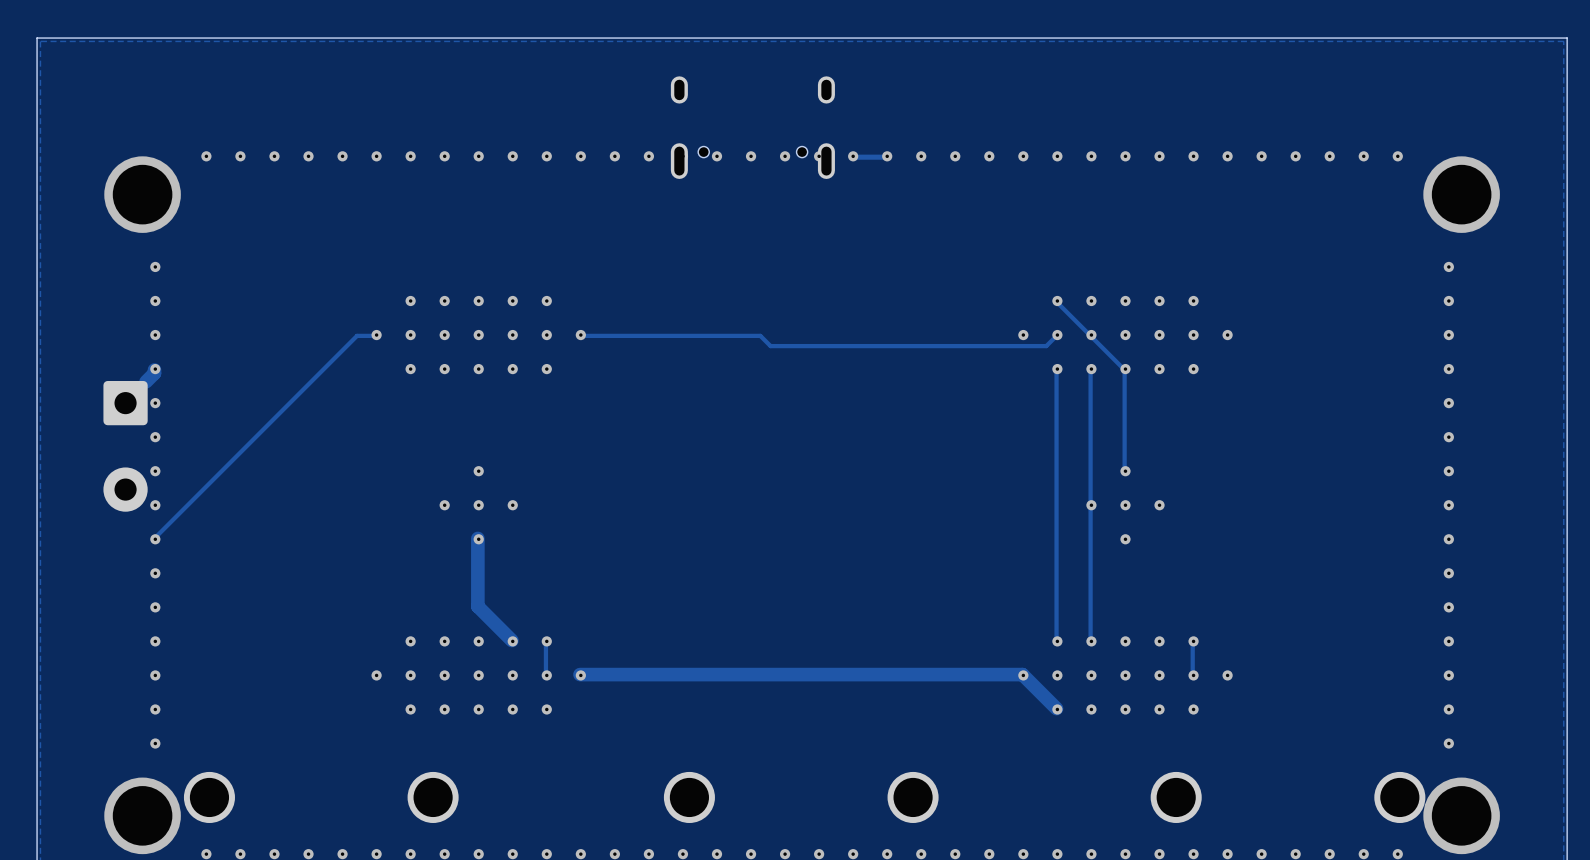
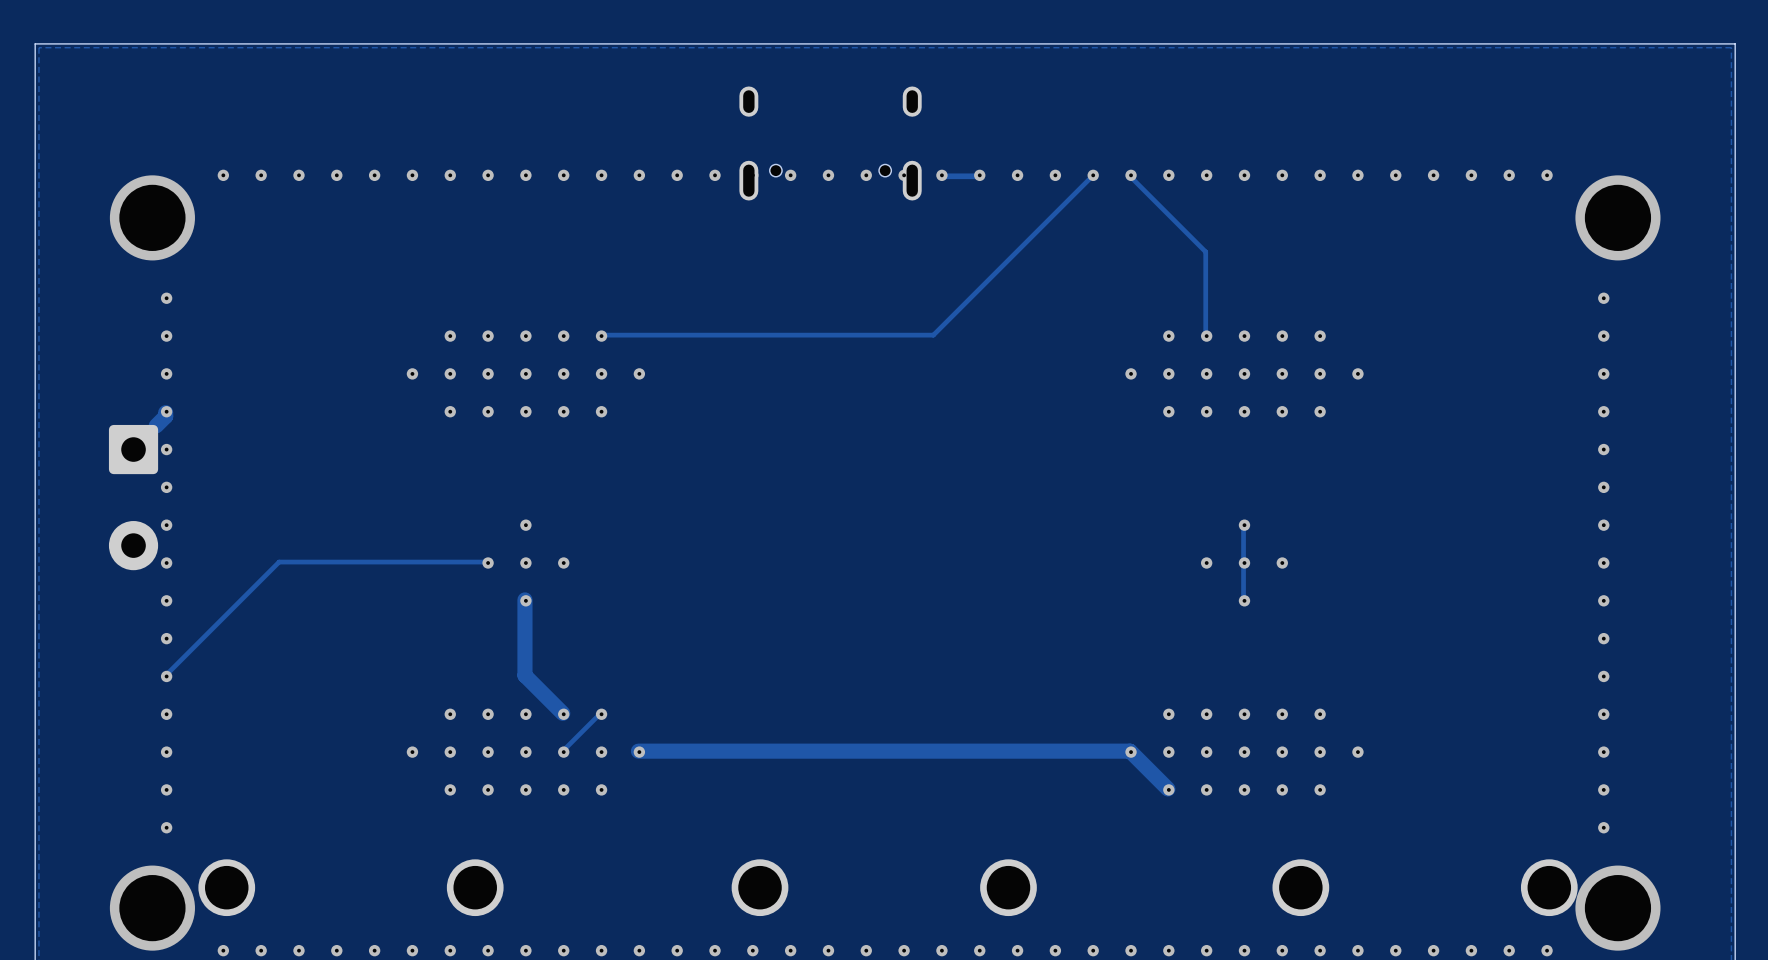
track: none -> (1092, 176) (933, 335) (602, 335) (600, 337)
track: none -> (1130, 176) (1205, 251) (1205, 337)
track: (1056, 301) (1124, 369) -> none
track: (375, 335) (357, 335) (154, 538) -> none
track: (1056, 335) (1046, 346) (770, 346) (760, 335) (579, 335) -> none
track: (1056, 369) (1056, 640) -> none
track: (1090, 369) (1090, 640) -> none
track: (1124, 369) (1124, 472) -> (1243, 599) (1243, 526)
track: none -> (487, 562) (279, 562) (165, 675)
track: (545, 640) (545, 674) -> (600, 713) (562, 751)
track: (1192, 640) (1192, 674) -> none

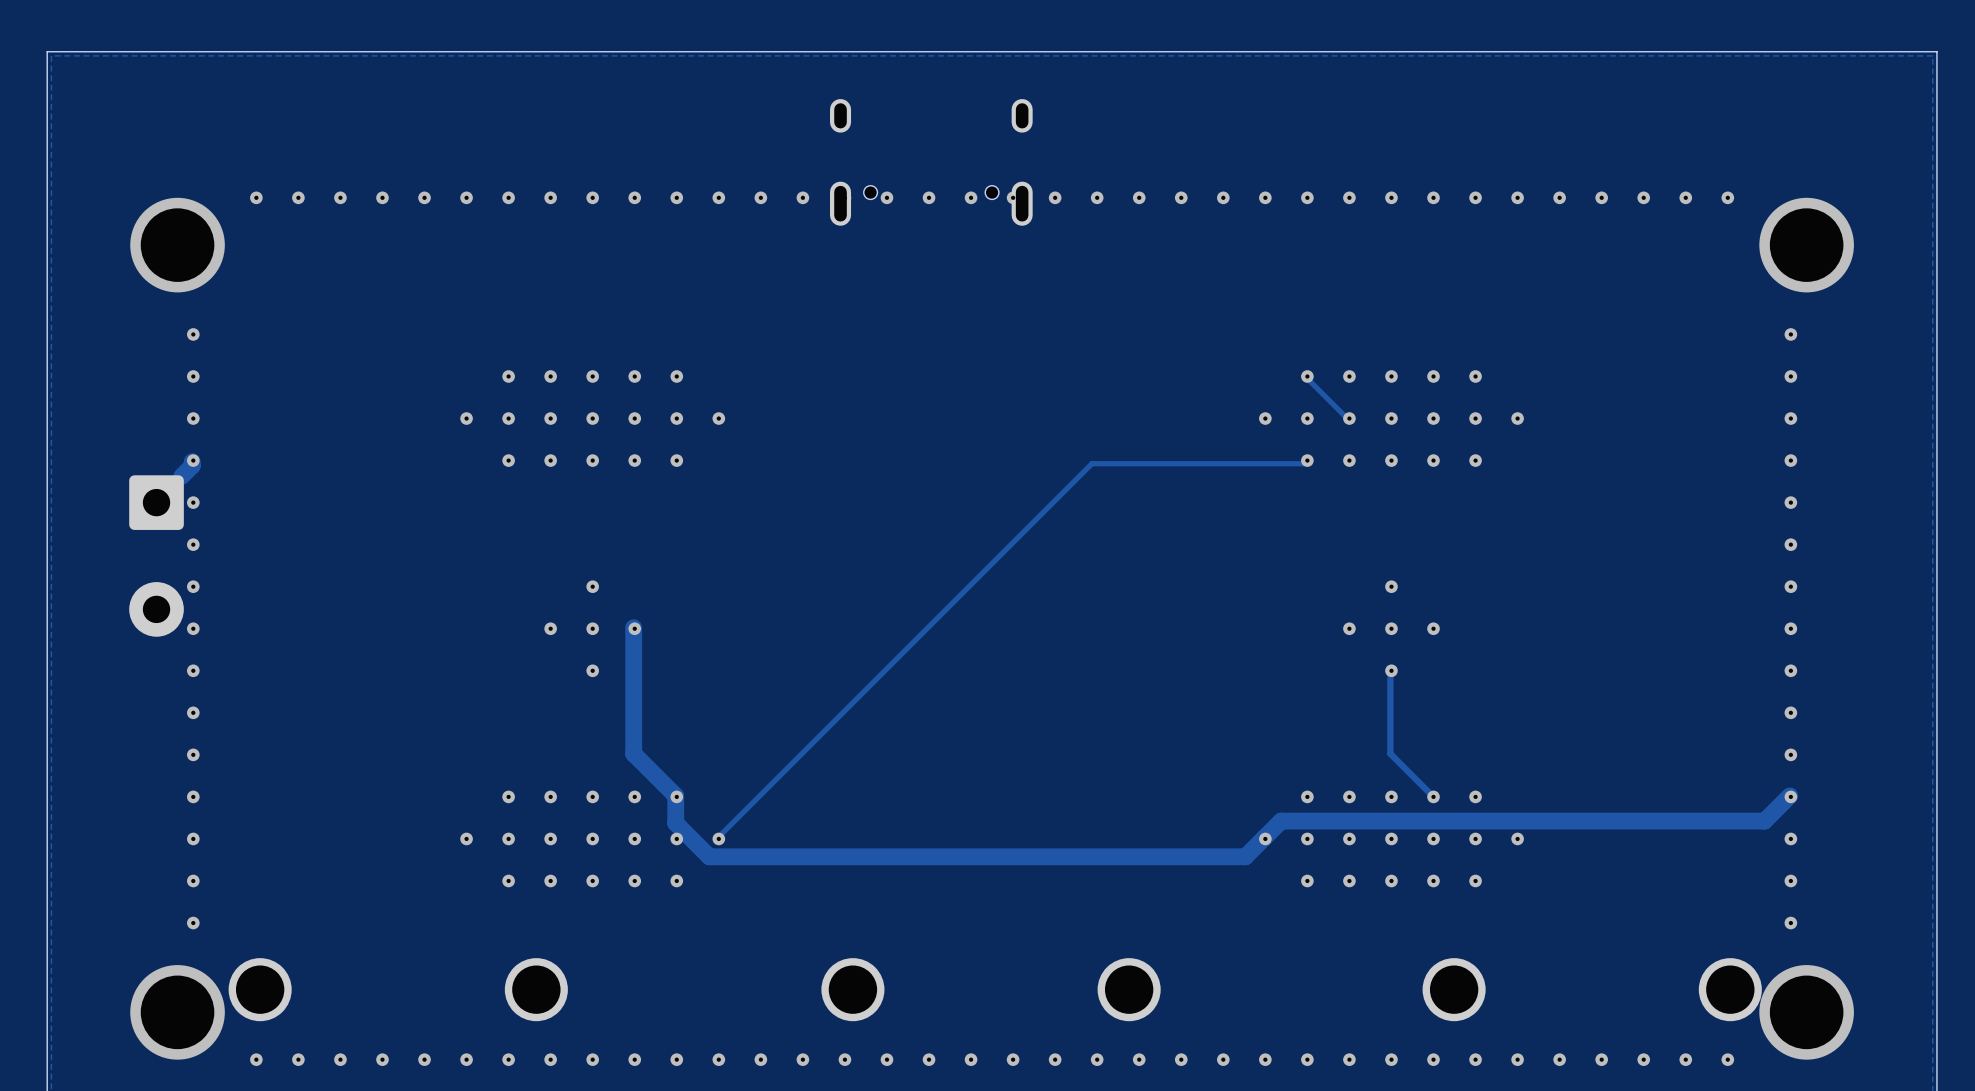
track: (978, 176) (940, 176) -> none
track: (1092, 176) (933, 335) (602, 335) (600, 337) -> none
track: (1130, 176) (1205, 251) (1205, 337) -> none
track: none -> (1306, 377) (1348, 419)
track: (1243, 526) (1243, 599) -> (1432, 795) (1390, 753) (1390, 669)
track: (487, 562) (279, 562) (165, 675) -> none
track: none -> (633, 627) (633, 753) (675, 795) (675, 823) (709, 856) (1245, 856) (1281, 821) (1764, 821) (1789, 795)
track: (524, 599) (524, 675) (562, 713) -> none
track: (600, 713) (562, 751) -> none
track: (1130, 751) (638, 751) -> (1306, 461) (1304, 463) (1091, 463) (717, 837)
track: (1131, 753) (1167, 788) -> none

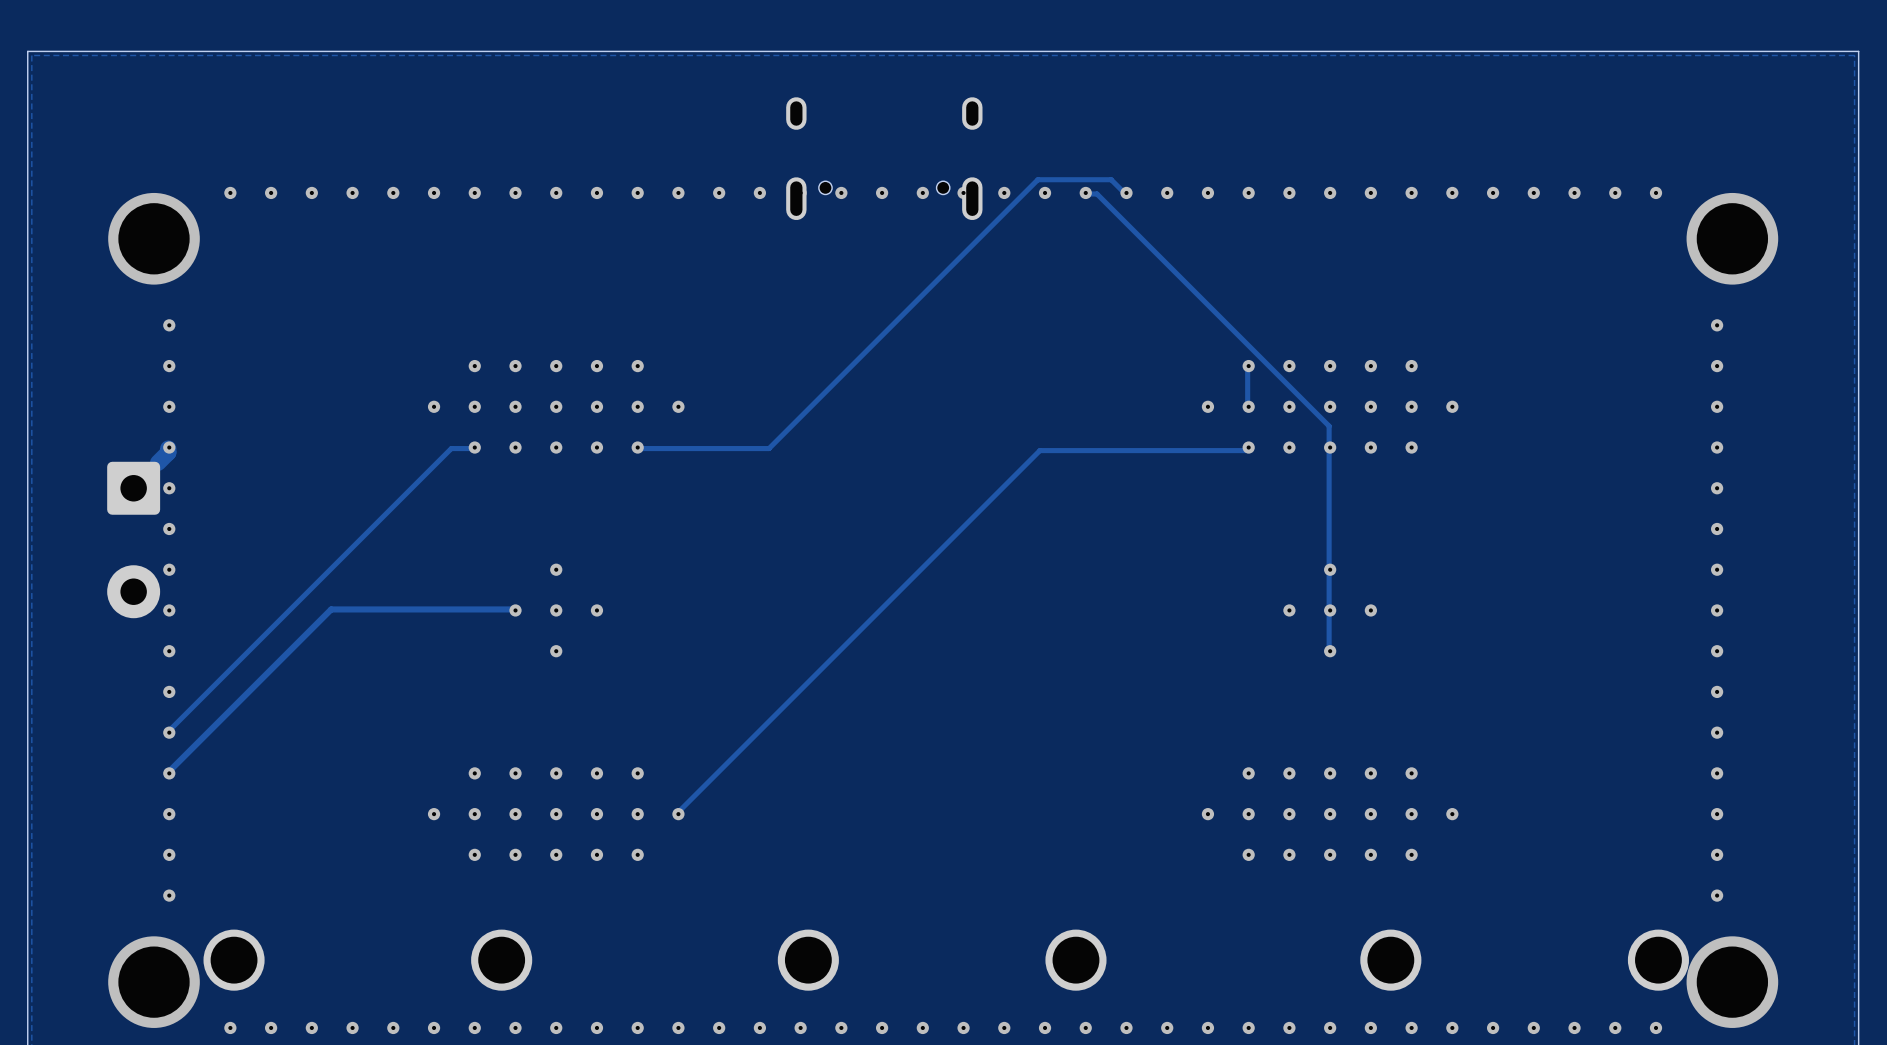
track: none -> (1125, 193) (1111, 179) (1037, 179) (769, 448) (636, 448)
track: (1306, 377) (1348, 419) -> (1247, 367) (1247, 407)
track: none -> (474, 447) (451, 448) (168, 731)
track: none -> (514, 609) (331, 609) (168, 772)
track: (633, 627) (633, 753) (675, 795) (675, 823) (709, 856) (1245, 856) (1281, 821) (1764, 821) (1789, 795) -> none
track: (1390, 669) (1390, 753) (1432, 795) -> (1329, 650) (1329, 426) (1096, 193) (1084, 193)

